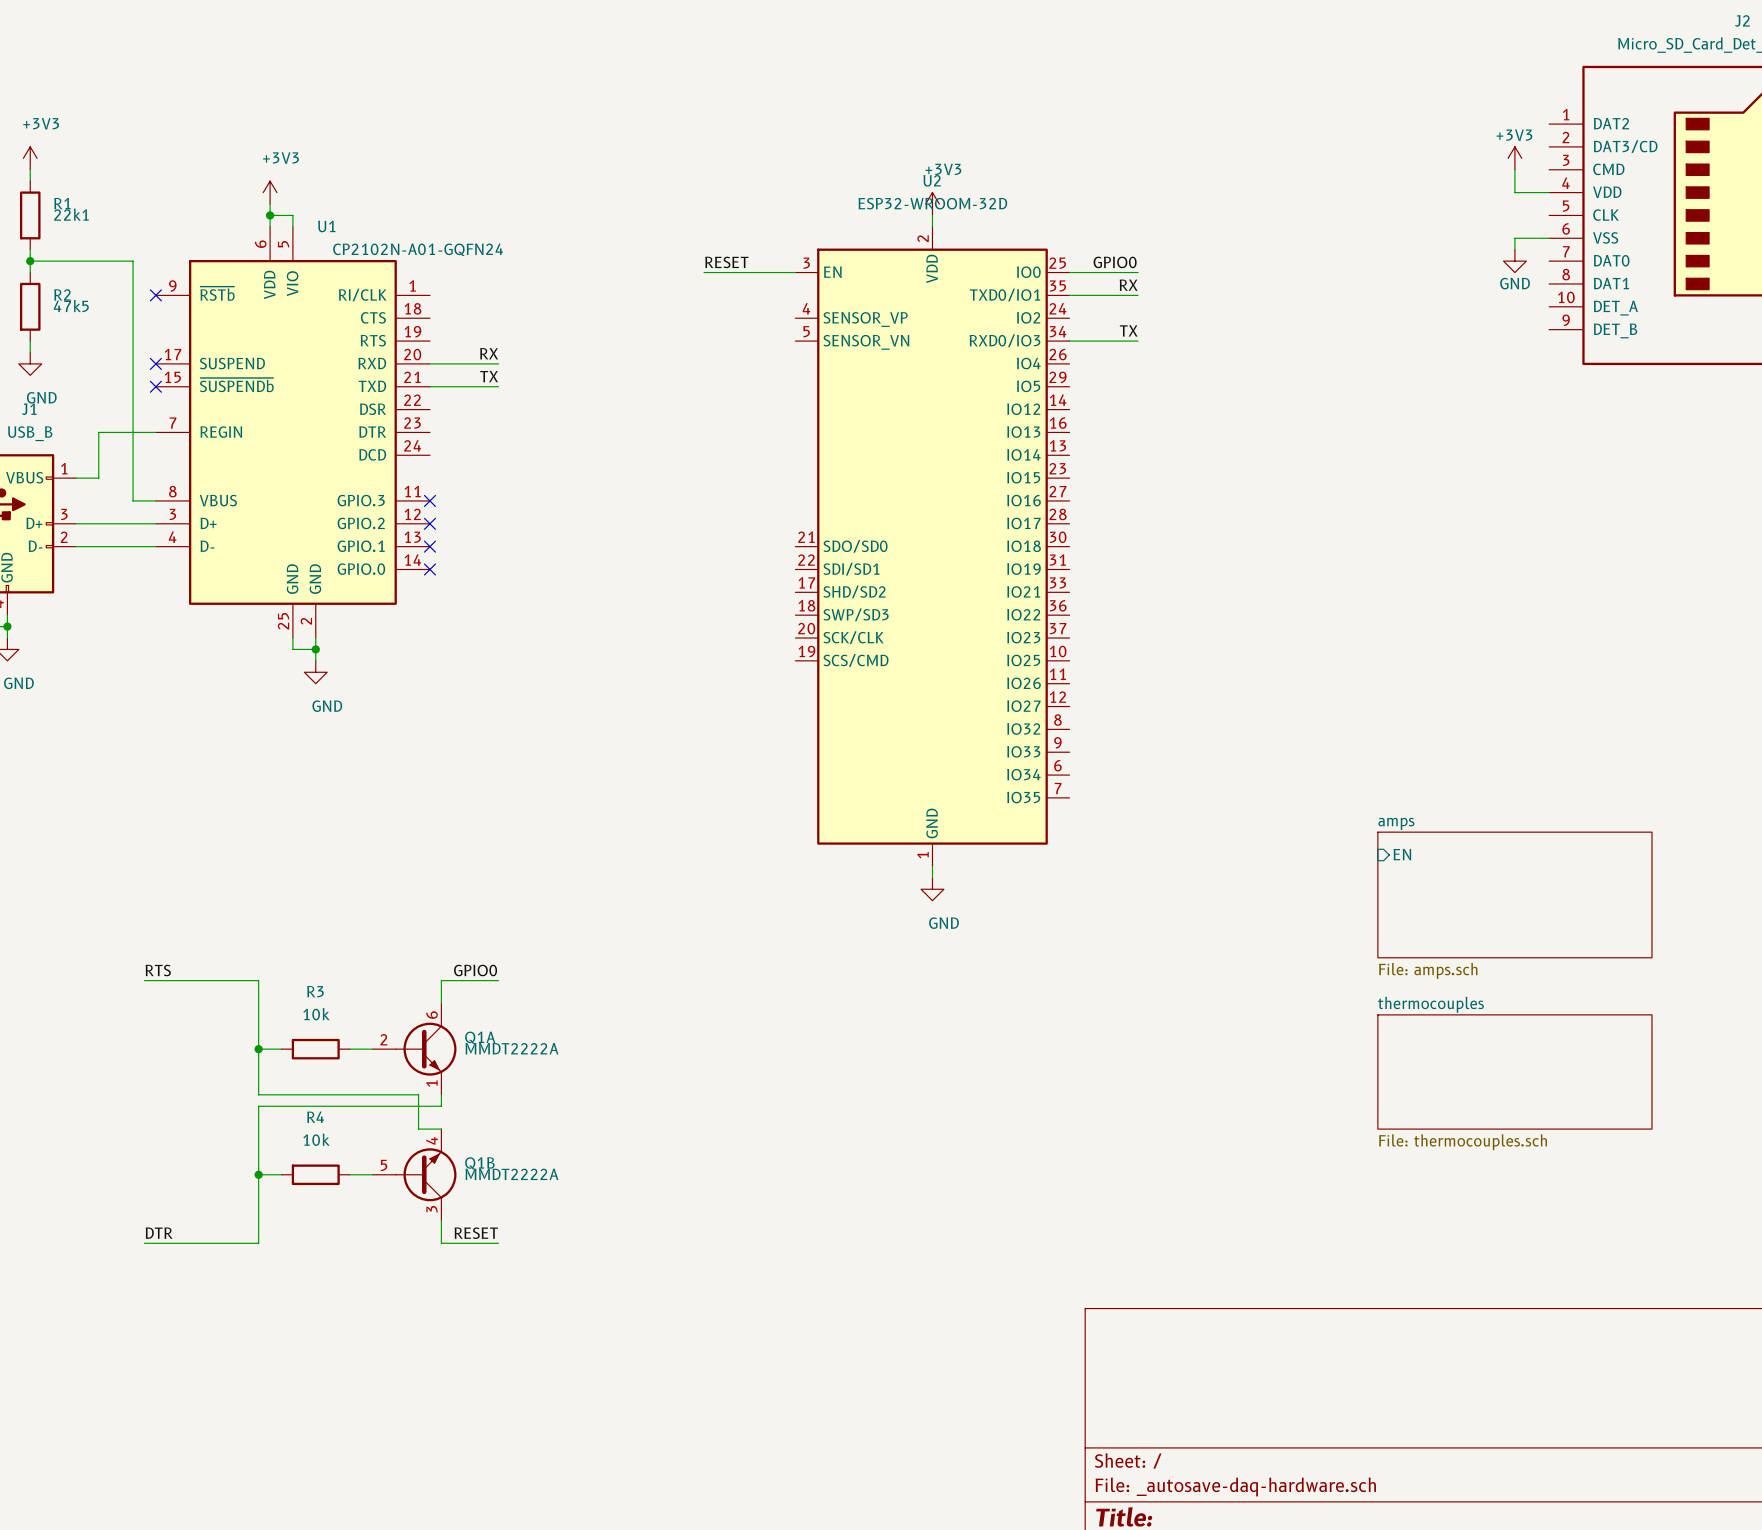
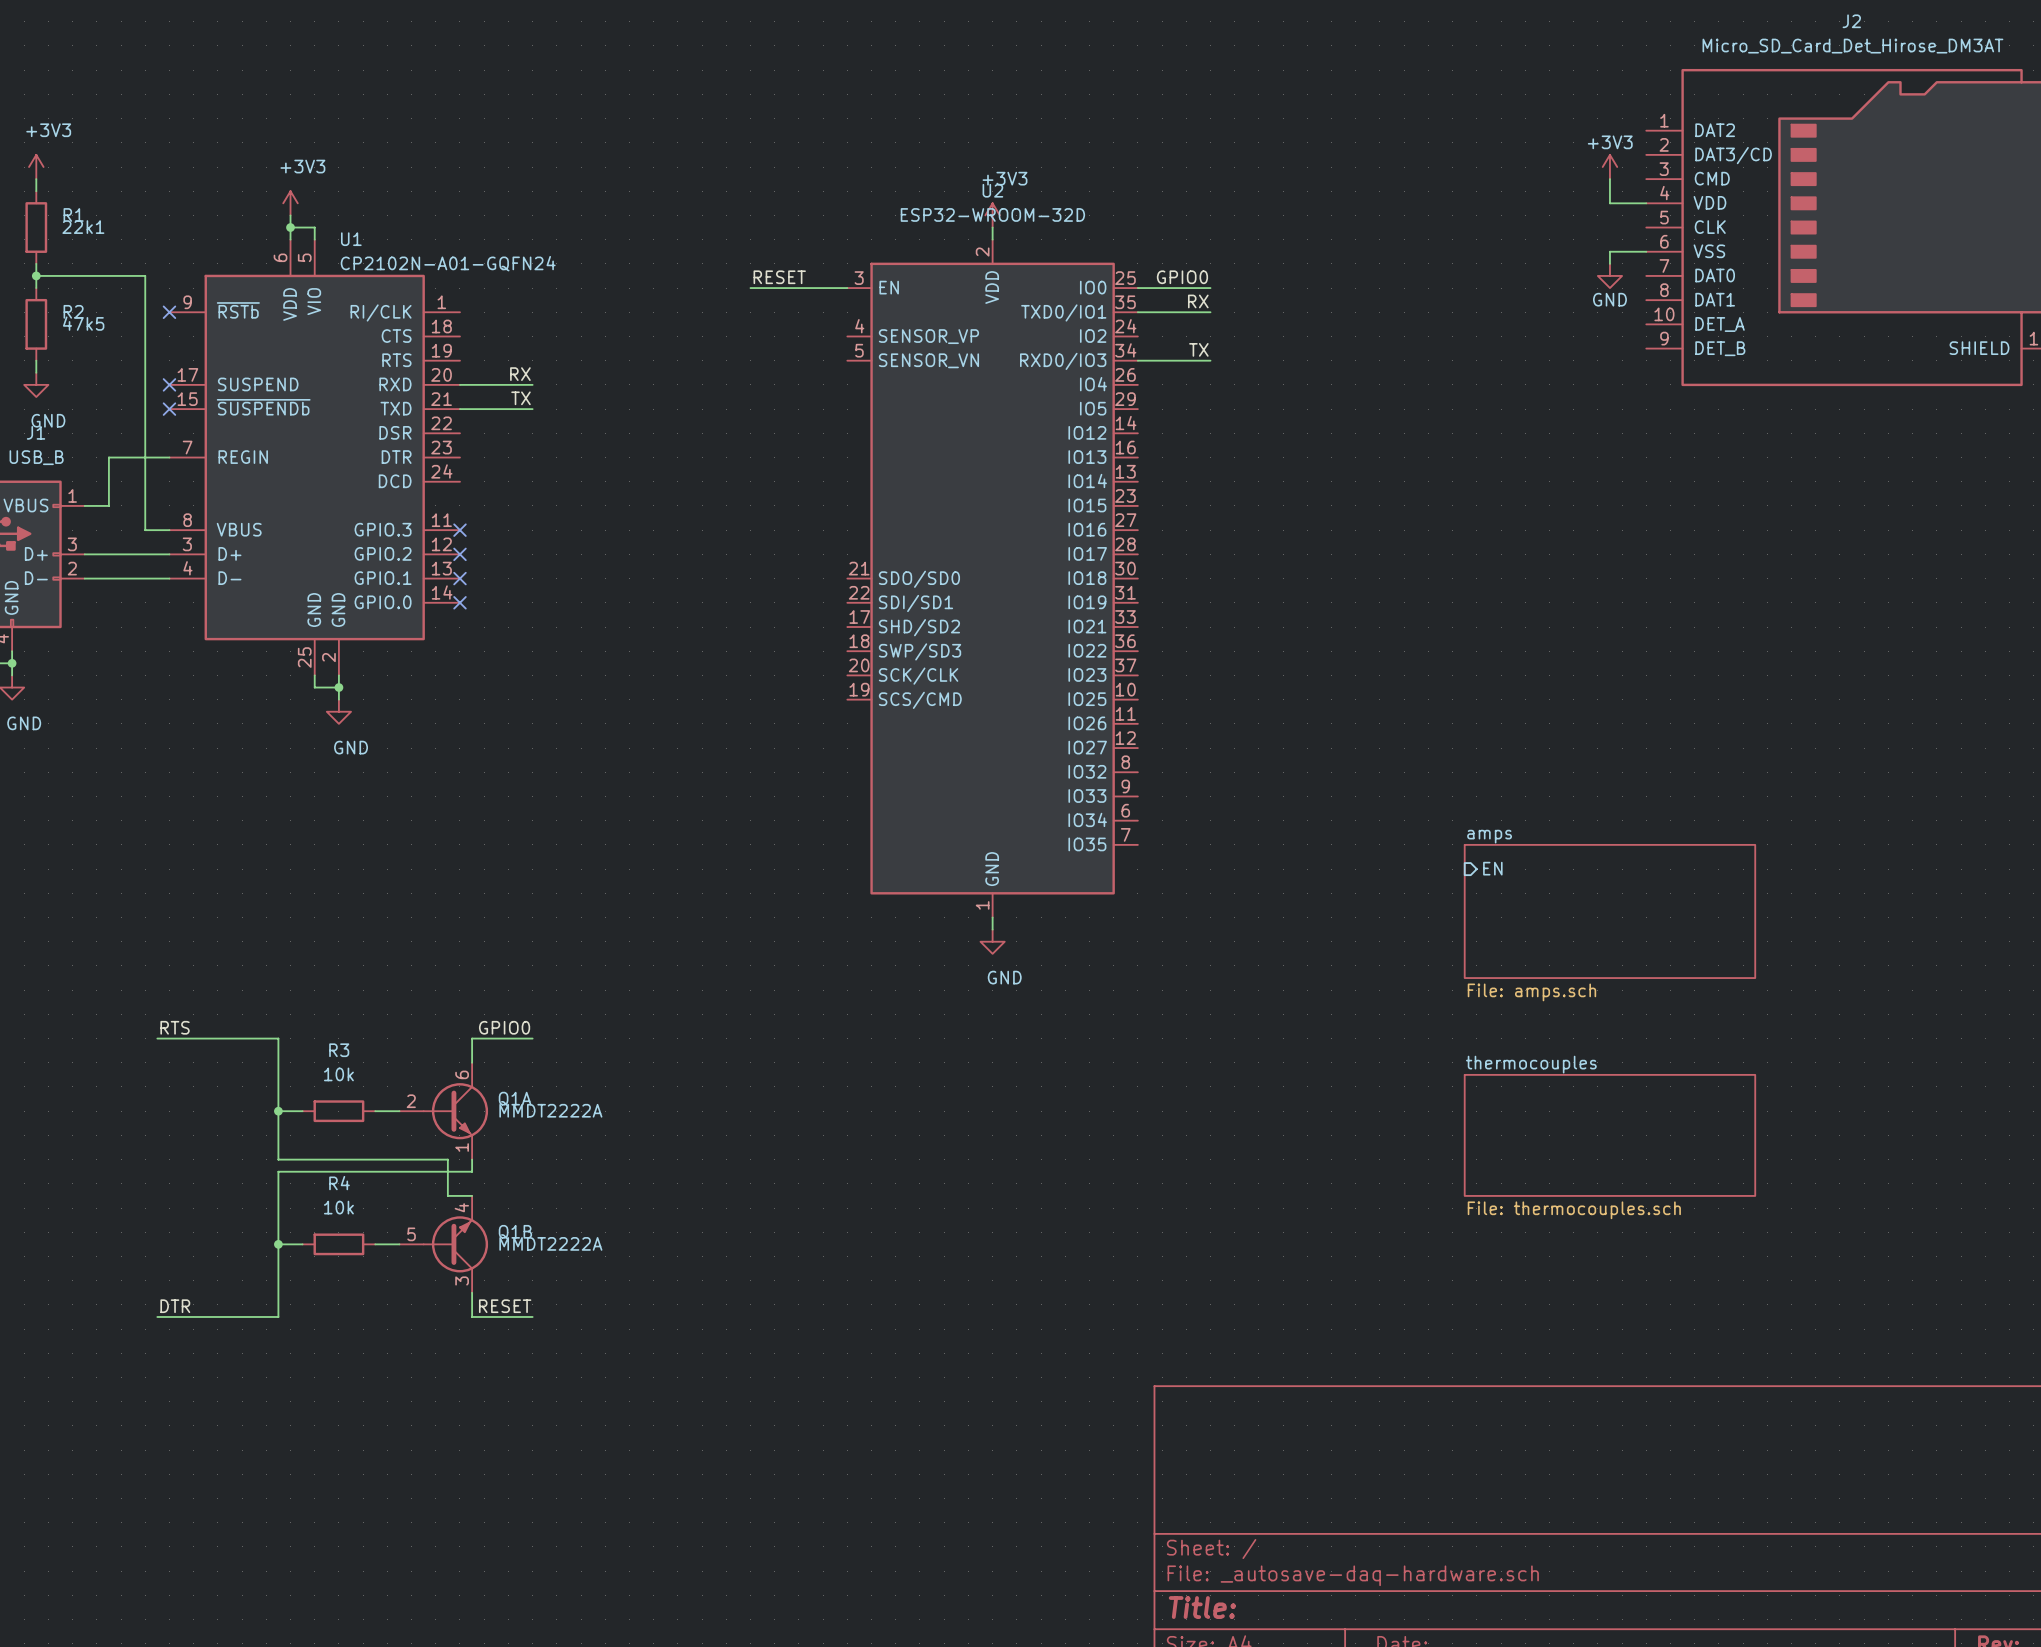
sheet pin position: EN (1402, 854) -> EN (1492, 868)
sheet amps position: (1514, 894) -> (1609, 911)

